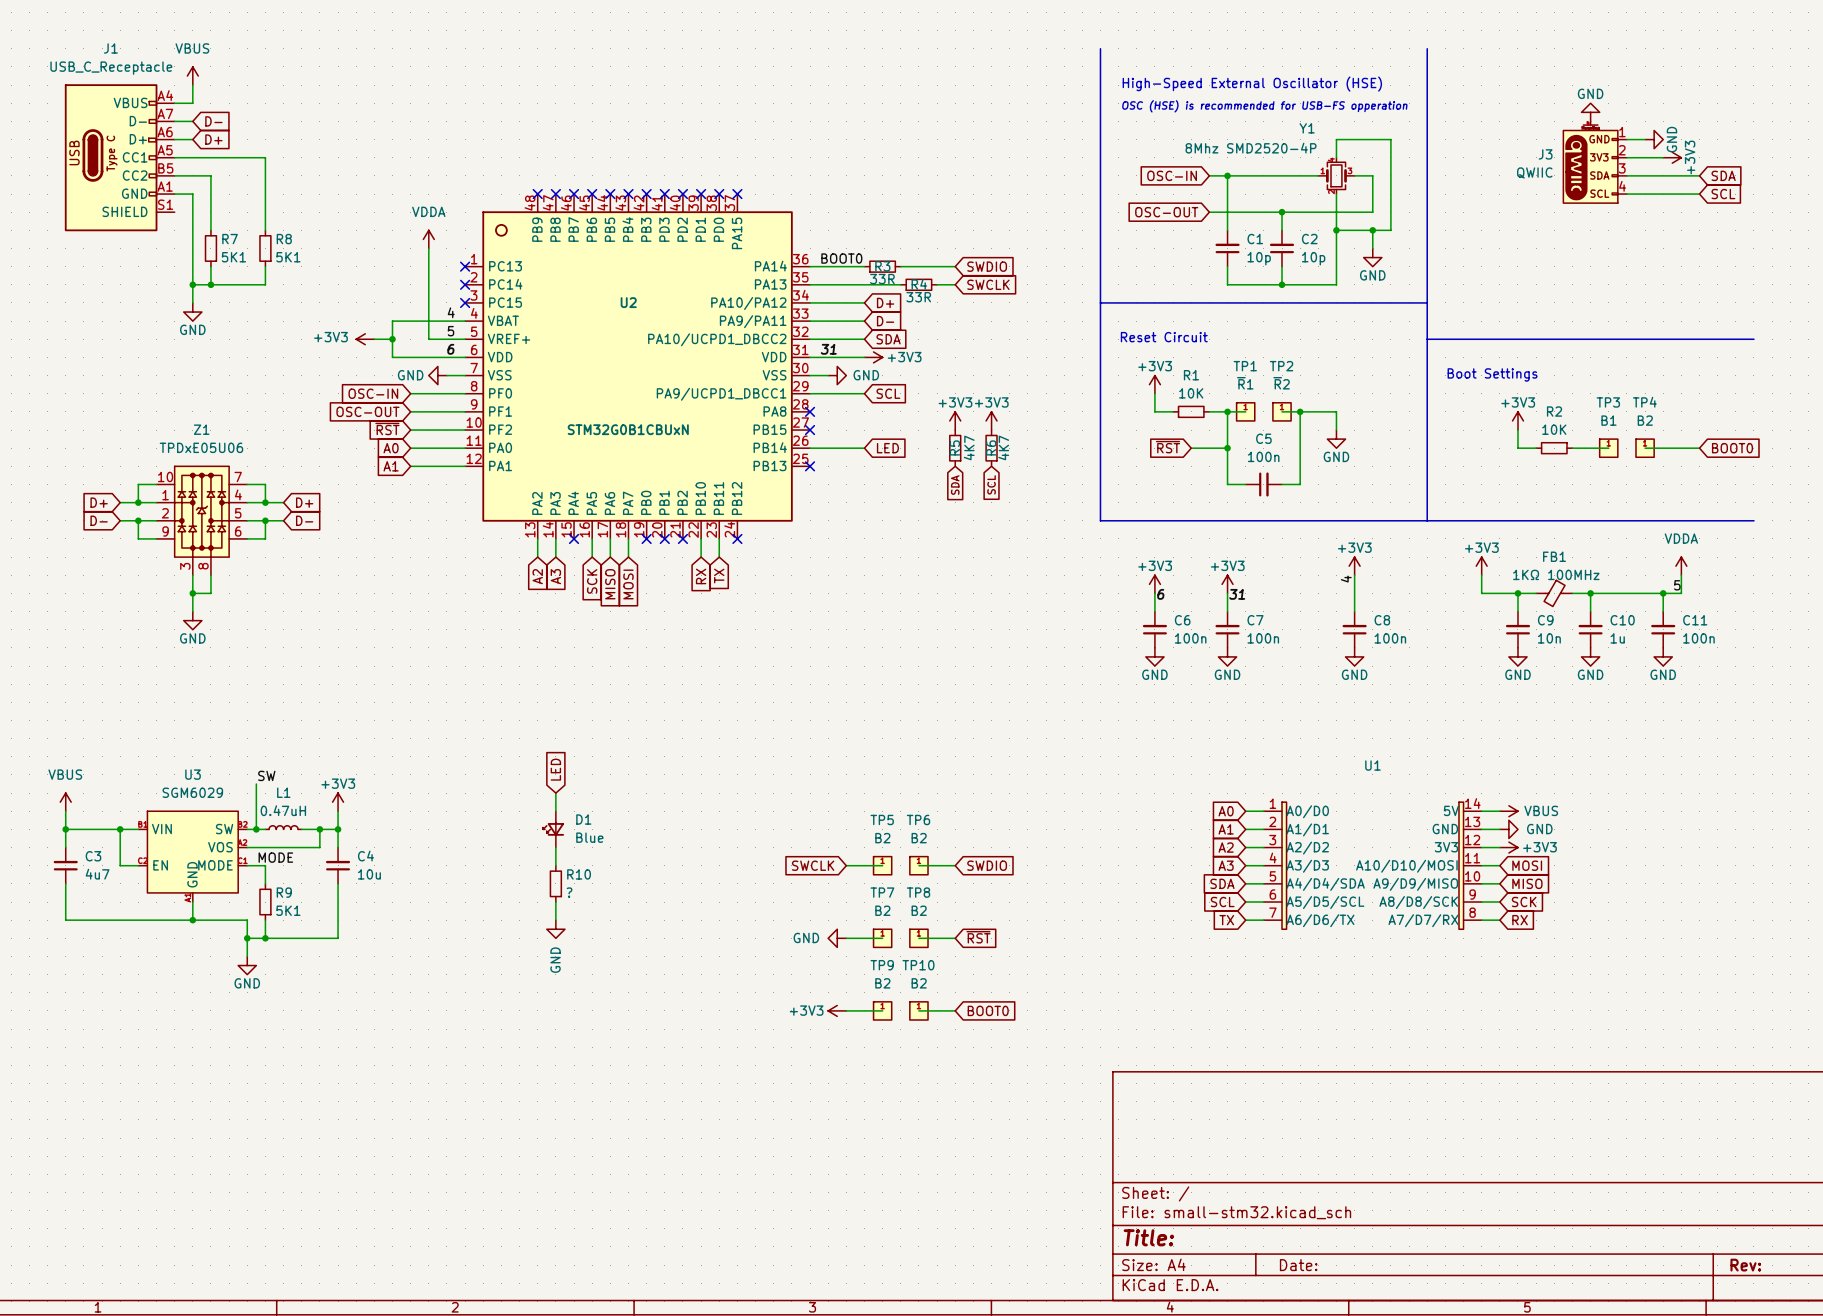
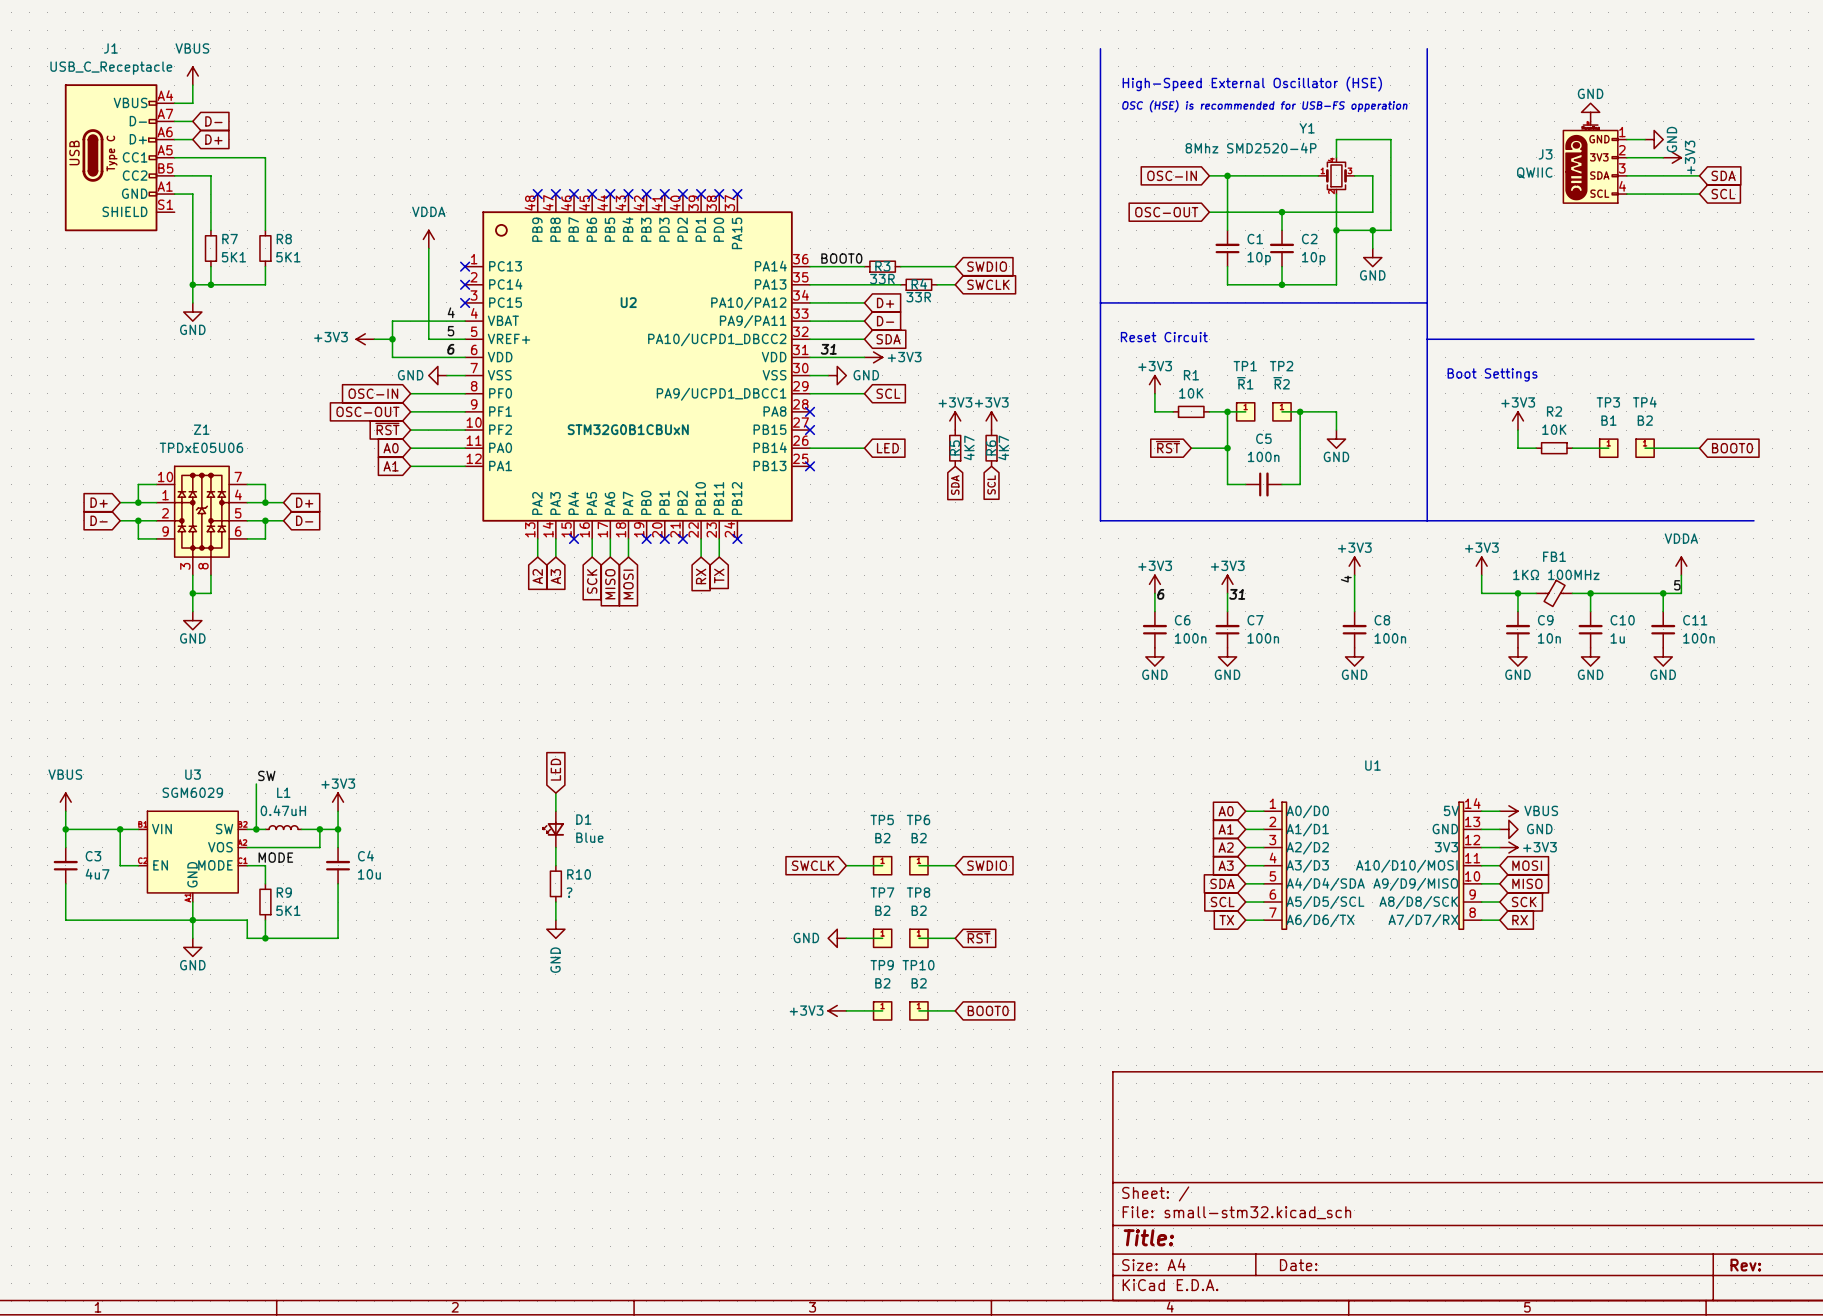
wire: (247, 938) (247, 956) -> (192, 920) (192, 938)
junction: (247, 938) -> none
power symbol position: GND (247, 965) -> GND (192, 947)

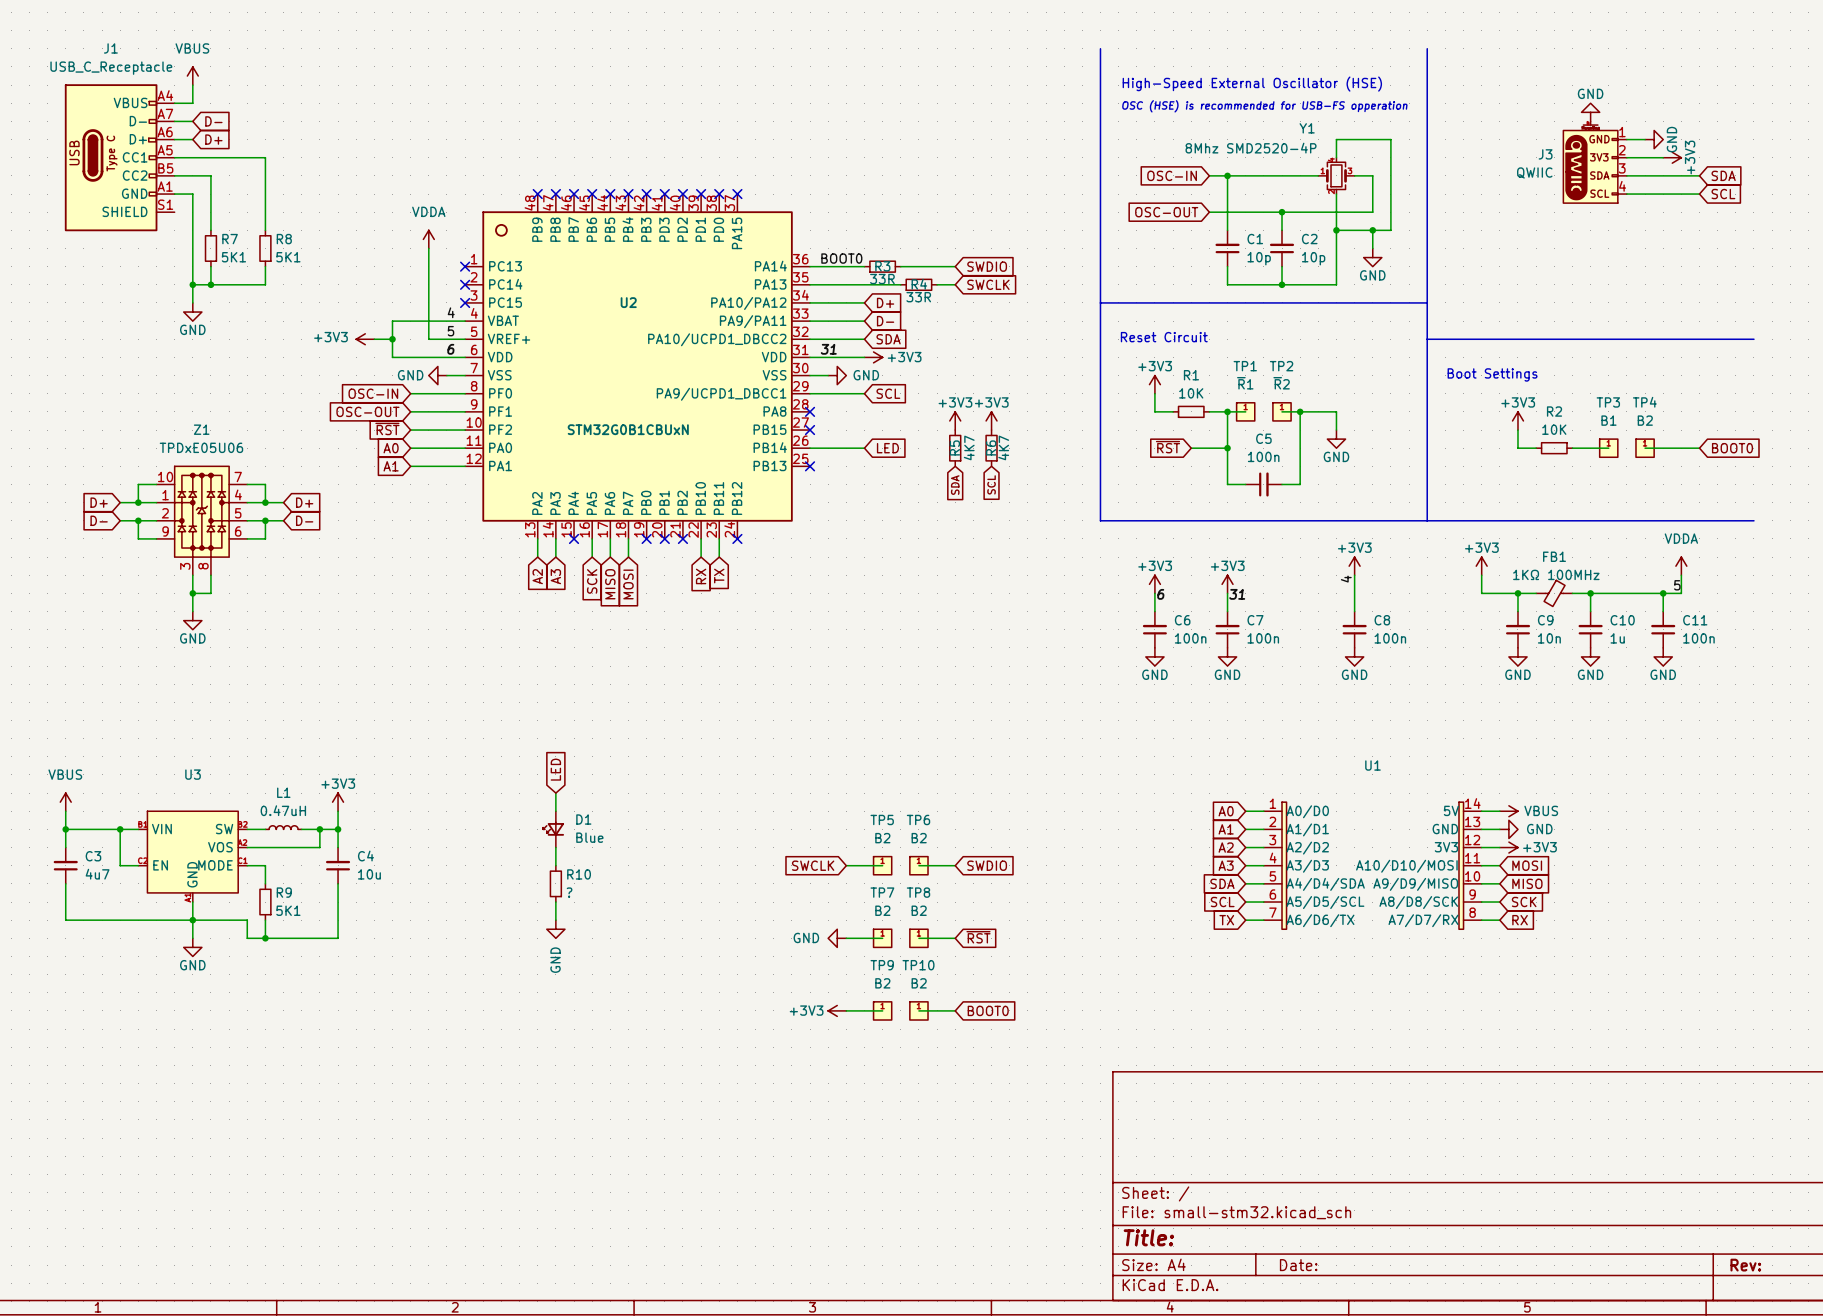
label: SW (266, 775) -> none
wire: (256, 784) (256, 829) -> none
U3 value: SGM6029 (192, 792) -> none
junction: (256, 829) -> none
label: MODE (275, 857) -> none

